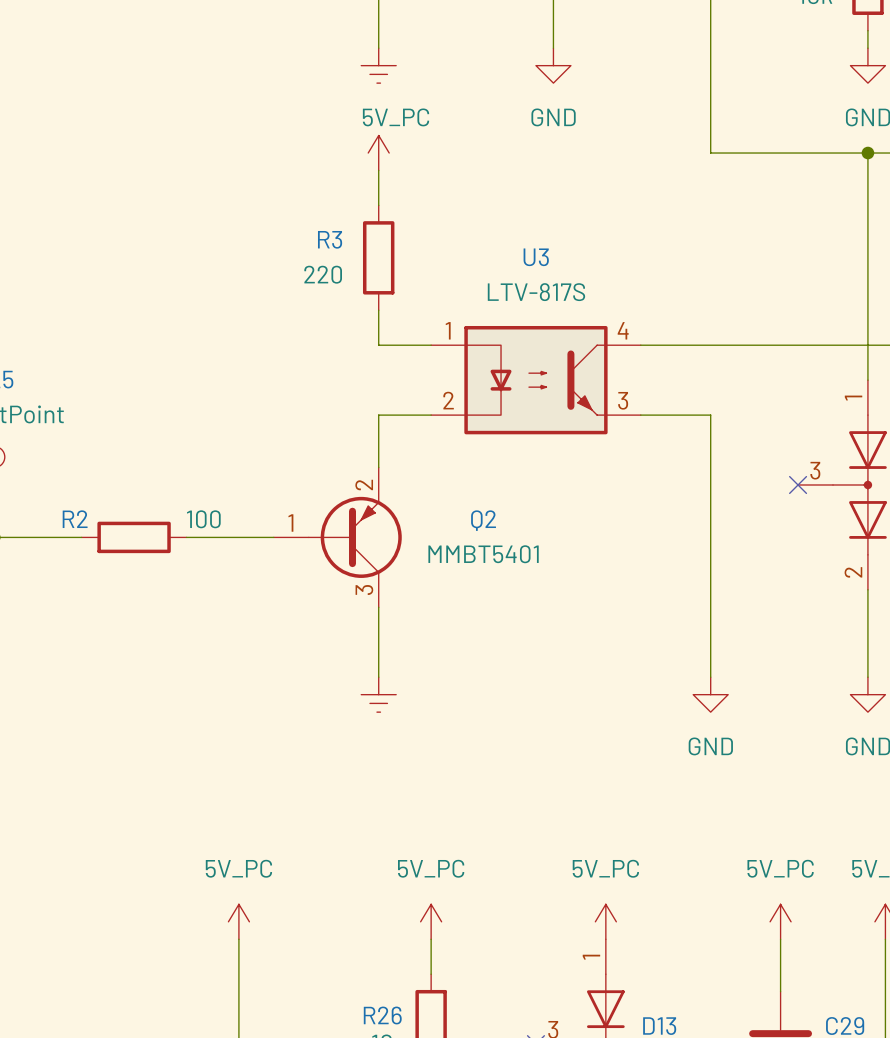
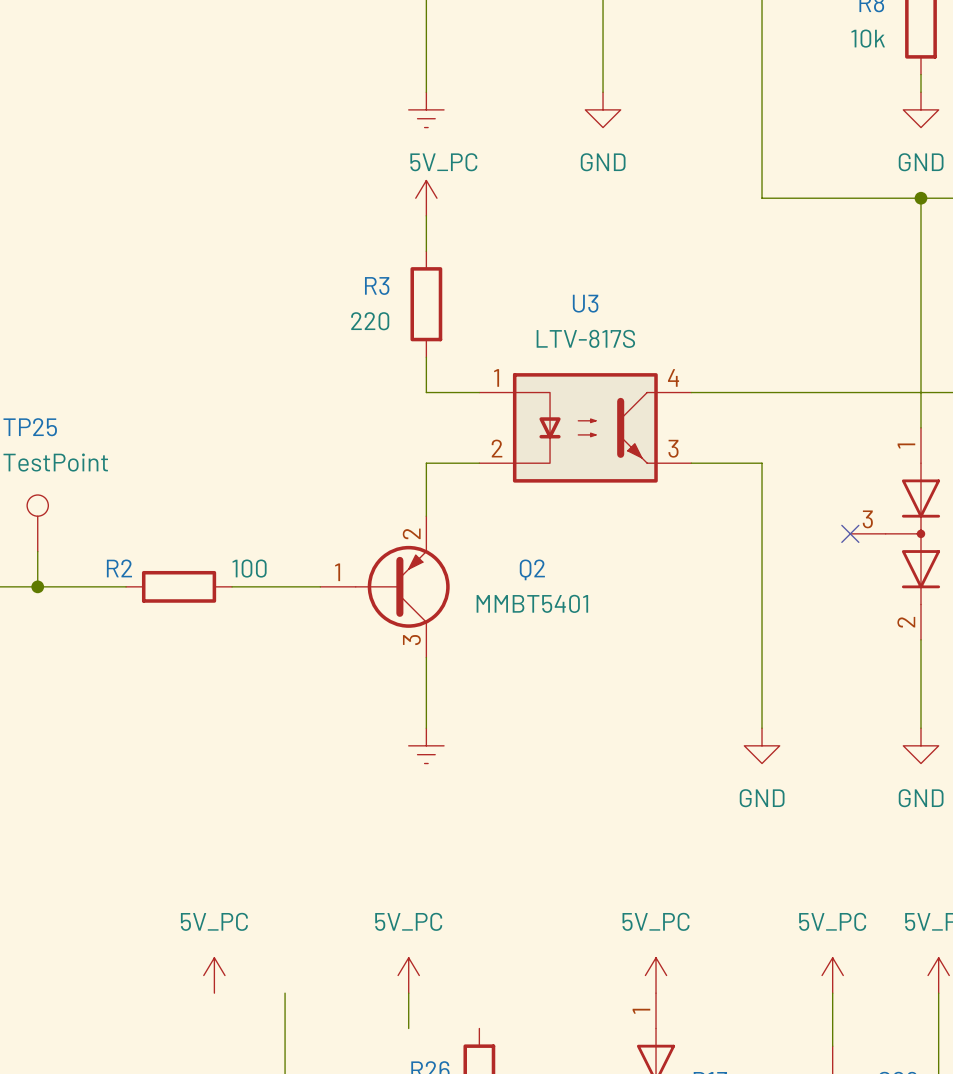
power symbol: none -> 5V_PC (214, 975)
power symbol: 5V_PC (238, 921) -> none
power symbol: none -> 5V_PC (408, 975)
power symbol: 5V_PC (431, 921) -> none
wire: (431, 939) (431, 974) -> (408, 993) (408, 1028)

